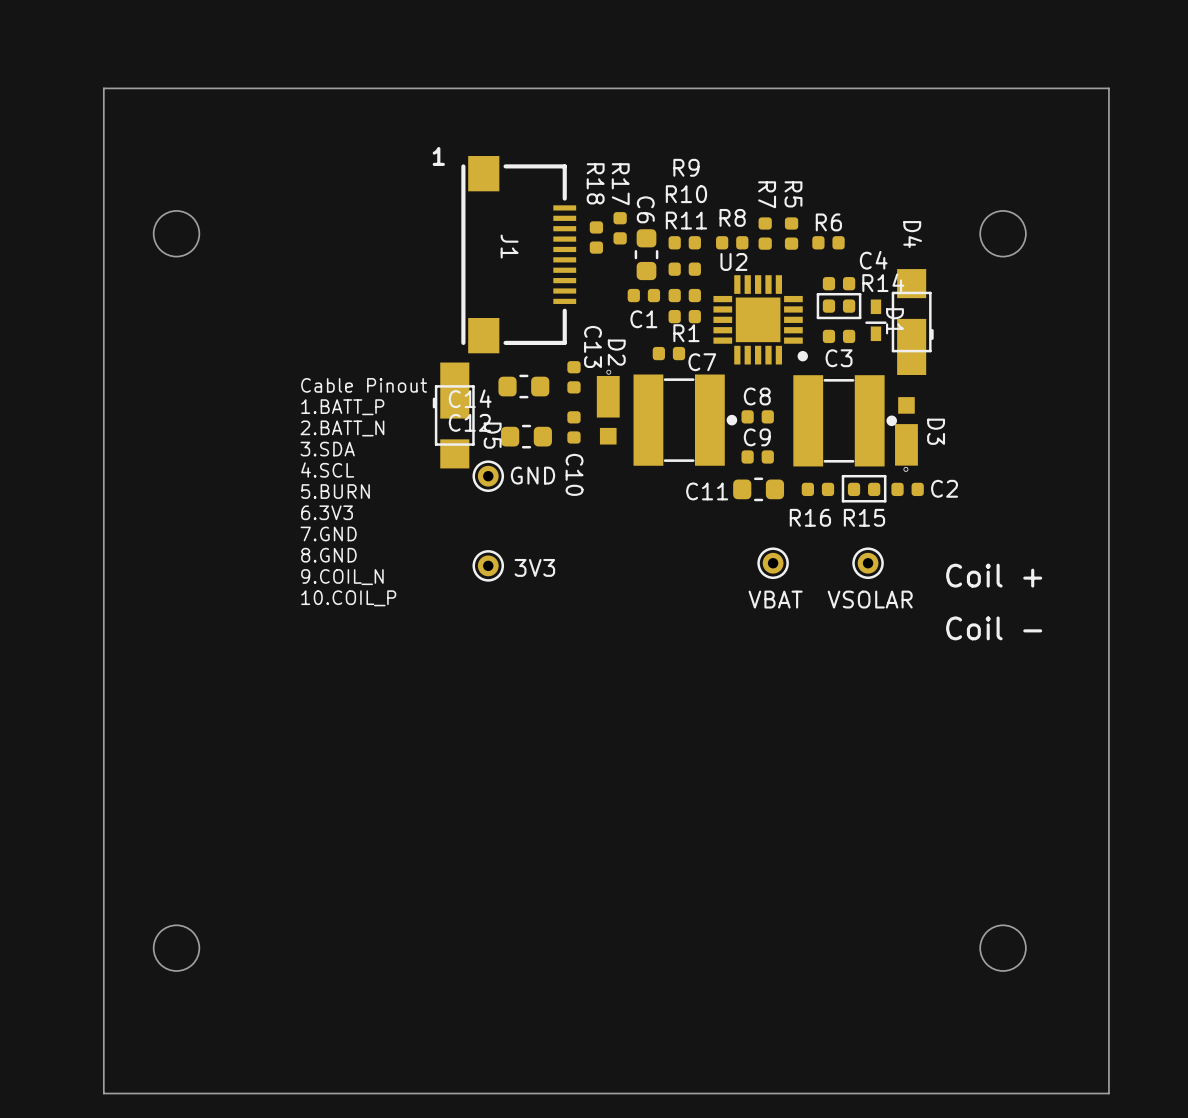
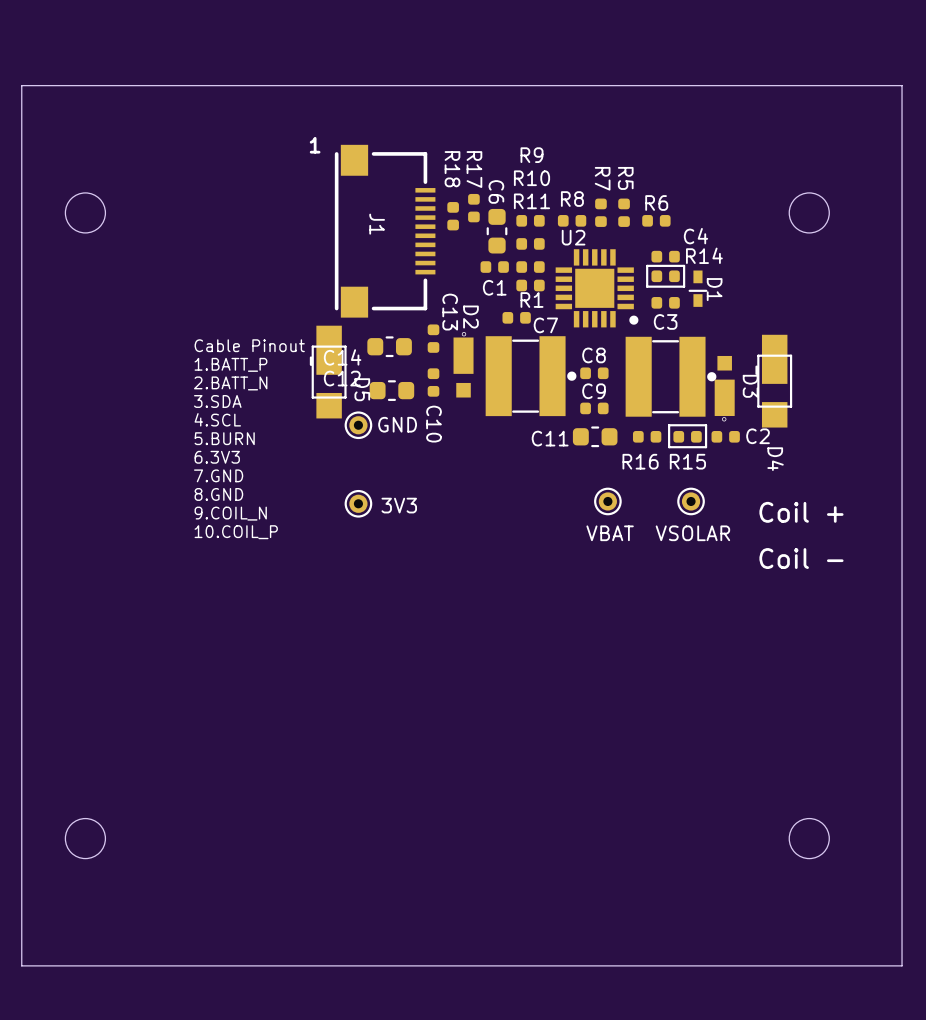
D4 rotation: 0° (912, 322) -> 180° (773, 381)
D4 position: (912, 322) -> (773, 381)

